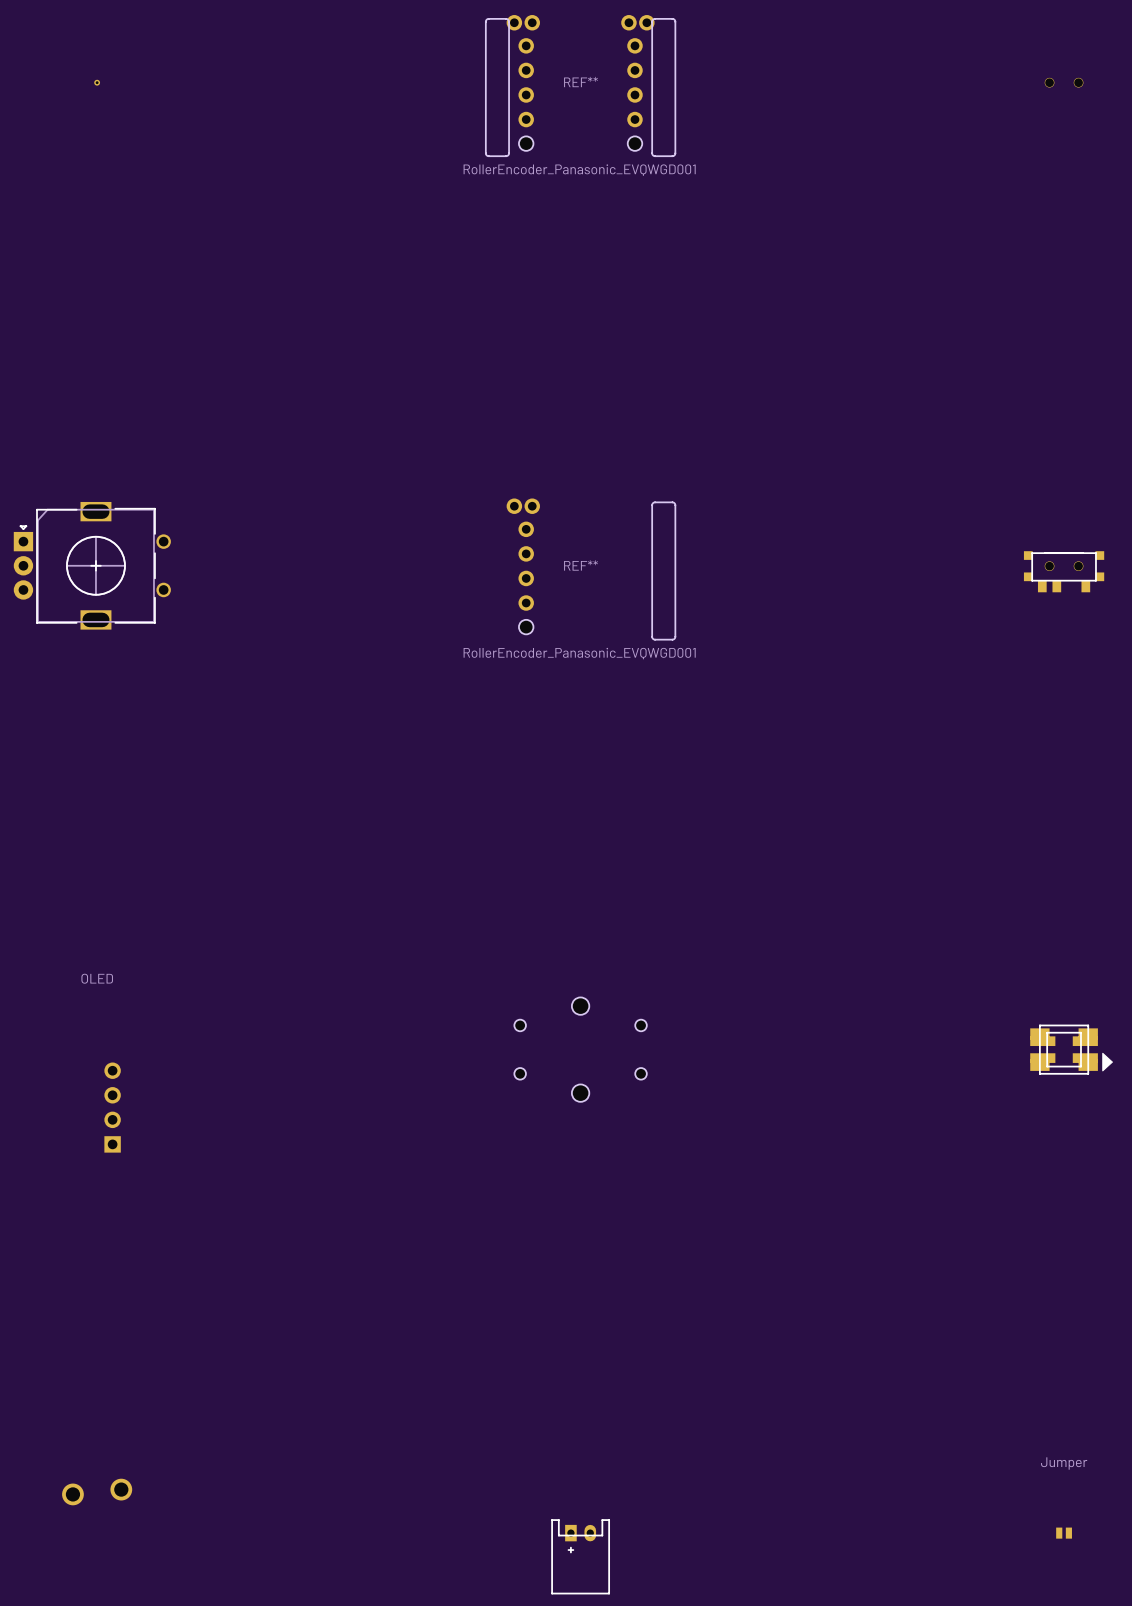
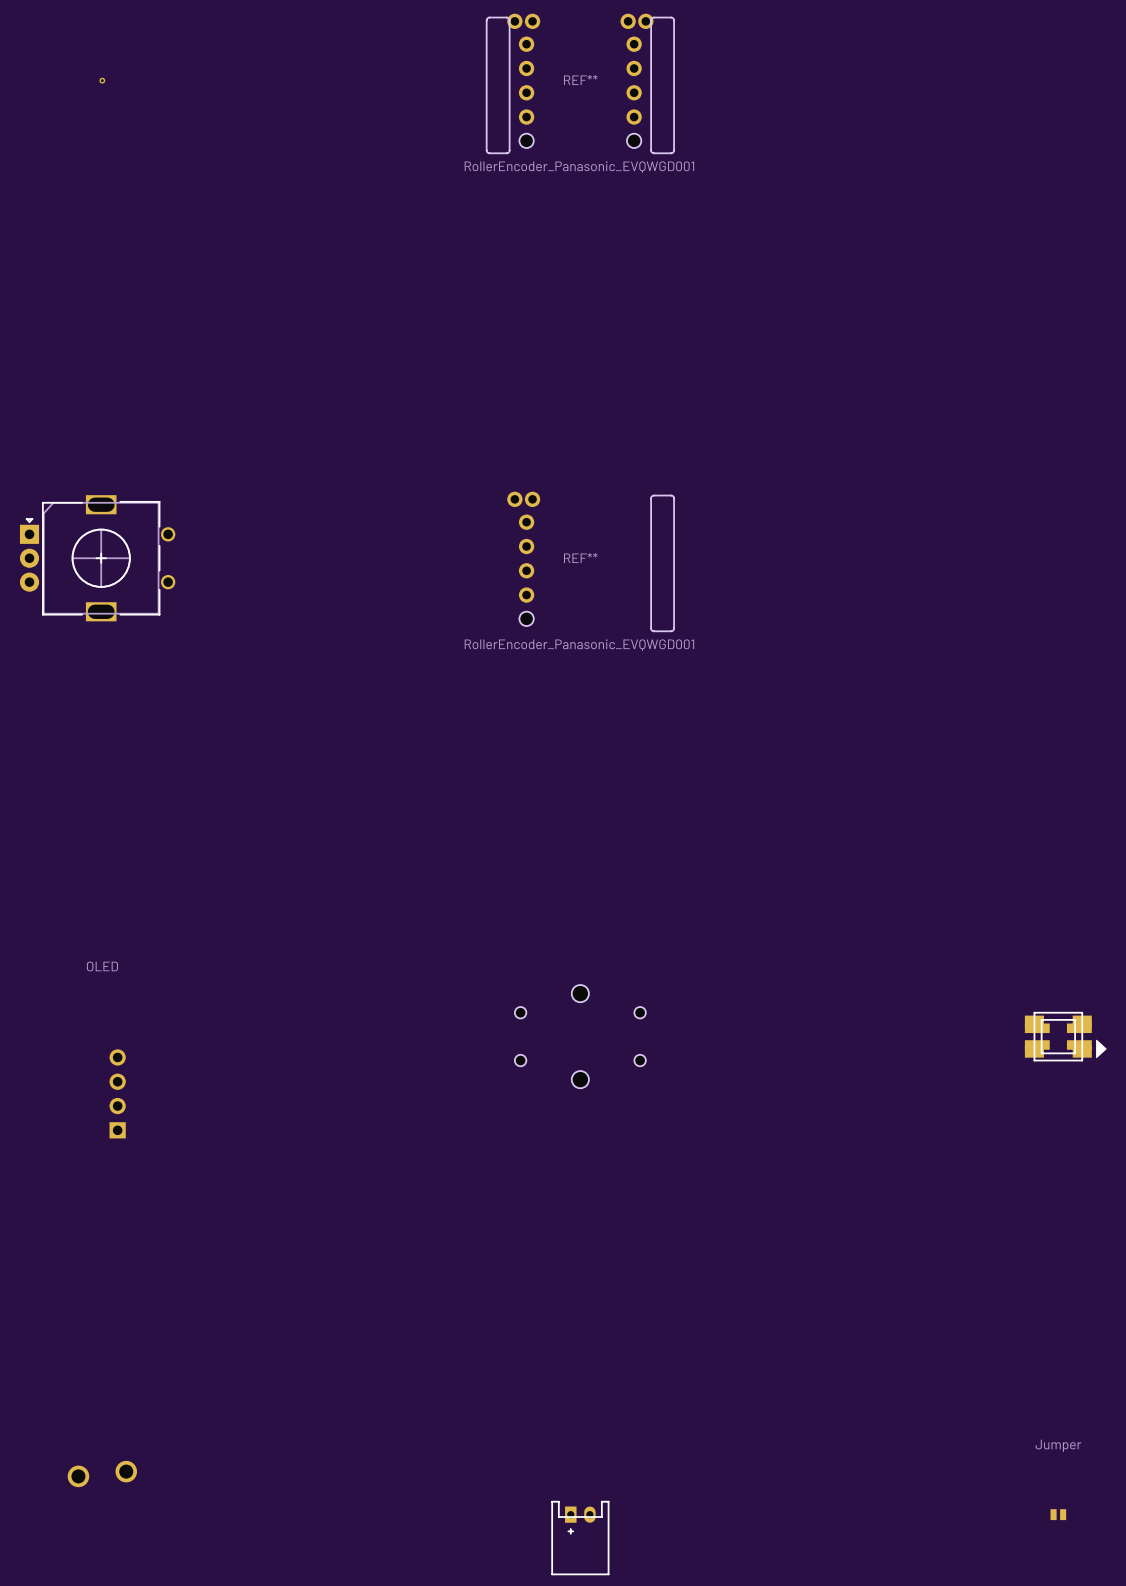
part: (1064, 82) -> none
part: (1064, 571) -> none

